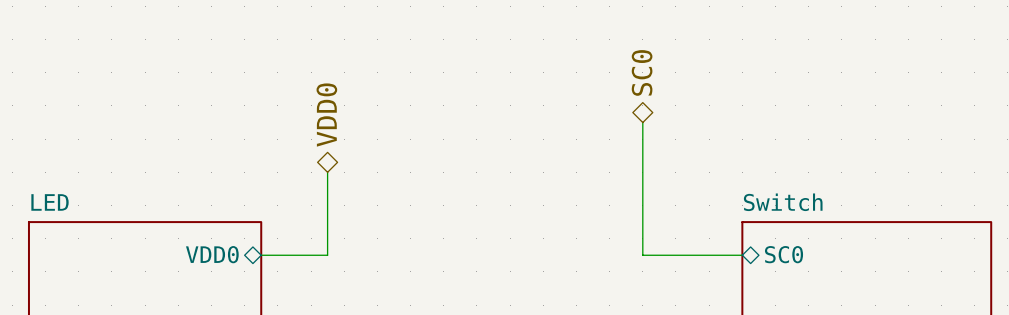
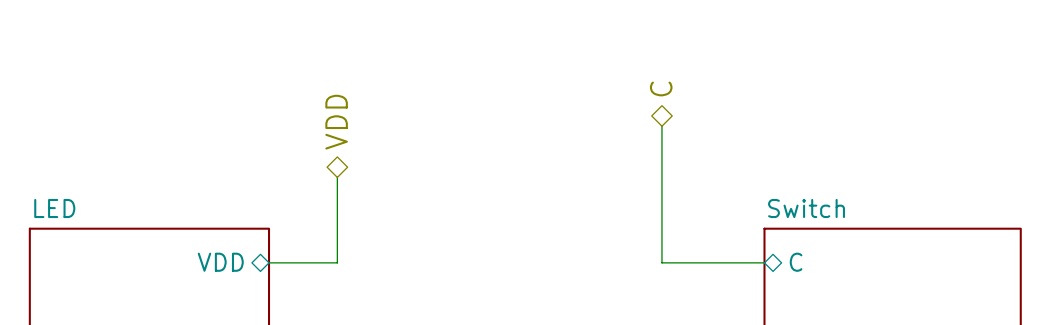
hierarchical label: SC0 (642, 72) -> C (661, 88)
hierarchical label: VDD0 (326, 115) -> VDD (336, 122)
sheet pin: VDD0 (212, 254) -> VDD (220, 262)
sheet pin: SC0 (784, 254) -> C (796, 262)

